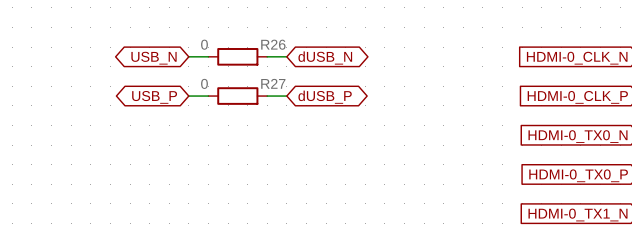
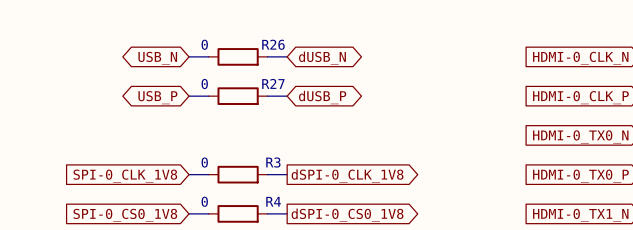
wire: none -> (189, 174) (208, 174)
R3: none -> 0 (238, 174)
wire: none -> (267, 174) (287, 174)
global label: none -> SPI-0_CLK_1V8 (125, 176)
global label: none -> dSPI-0_CLK_1V8 (347, 176)
wire: none -> (189, 213) (208, 213)
R4: none -> 0 (238, 213)
wire: none -> (267, 213) (287, 213)
global label: none -> dSPI-0_CS0_1V8 (347, 215)
global label: none -> SPI-0_CS0_1V8 (125, 215)

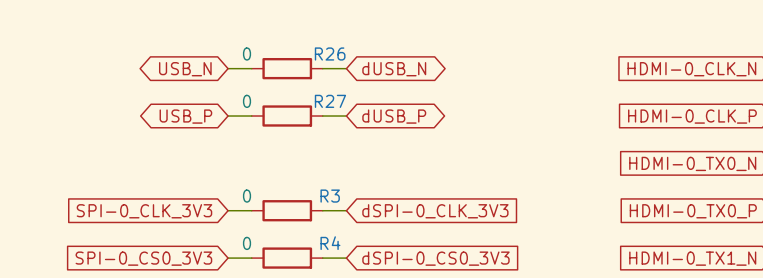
global label: SPI-0_CLK_1V8 (125, 176) -> SPI-0_CLK_3V3 (144, 211)
global label shape: output (347, 176) -> input (435, 211)
global label: dSPI-0_CLK_1V8 (347, 176) -> dSPI-0_CLK_3V3 (435, 211)
global label: SPI-0_CS0_1V8 (125, 215) -> SPI-0_CS0_3V3 (143, 258)
global label shape: output (347, 215) -> input (435, 258)
global label: dSPI-0_CS0_1V8 (347, 215) -> dSPI-0_CS0_3V3 (435, 258)

